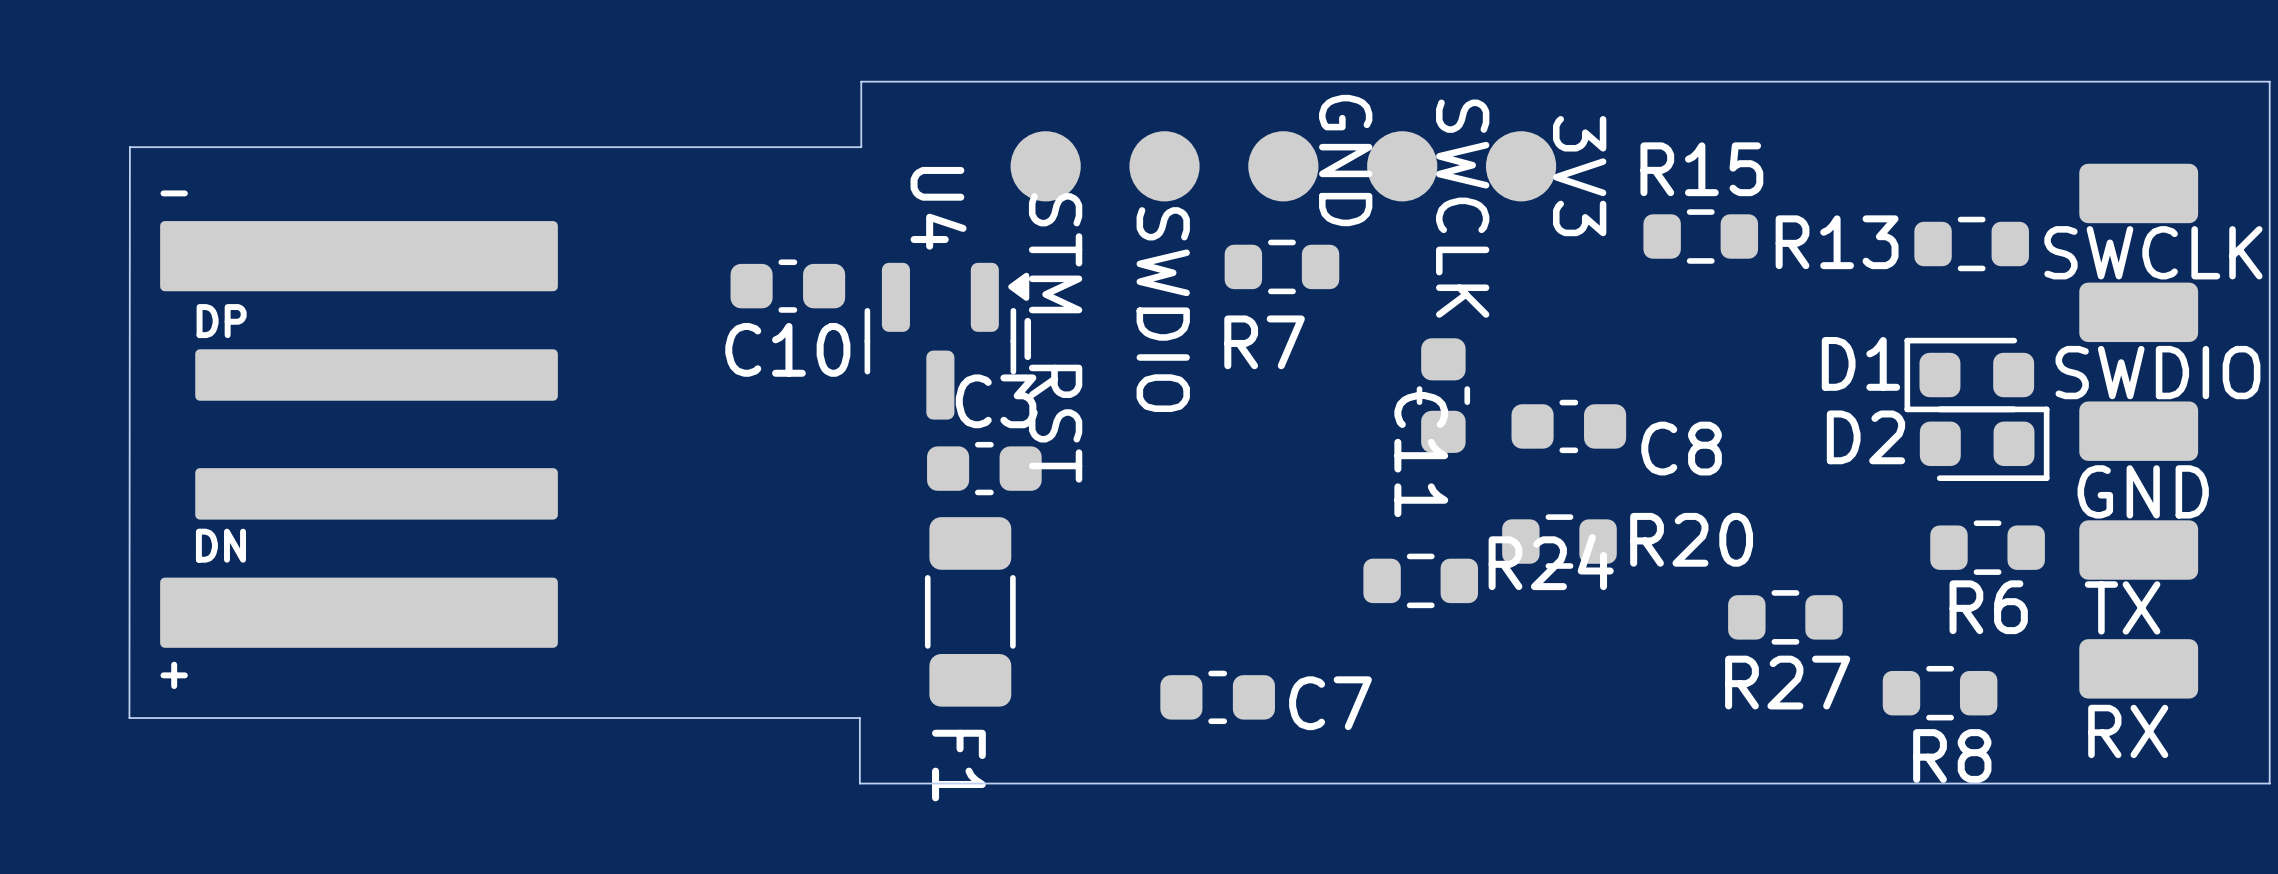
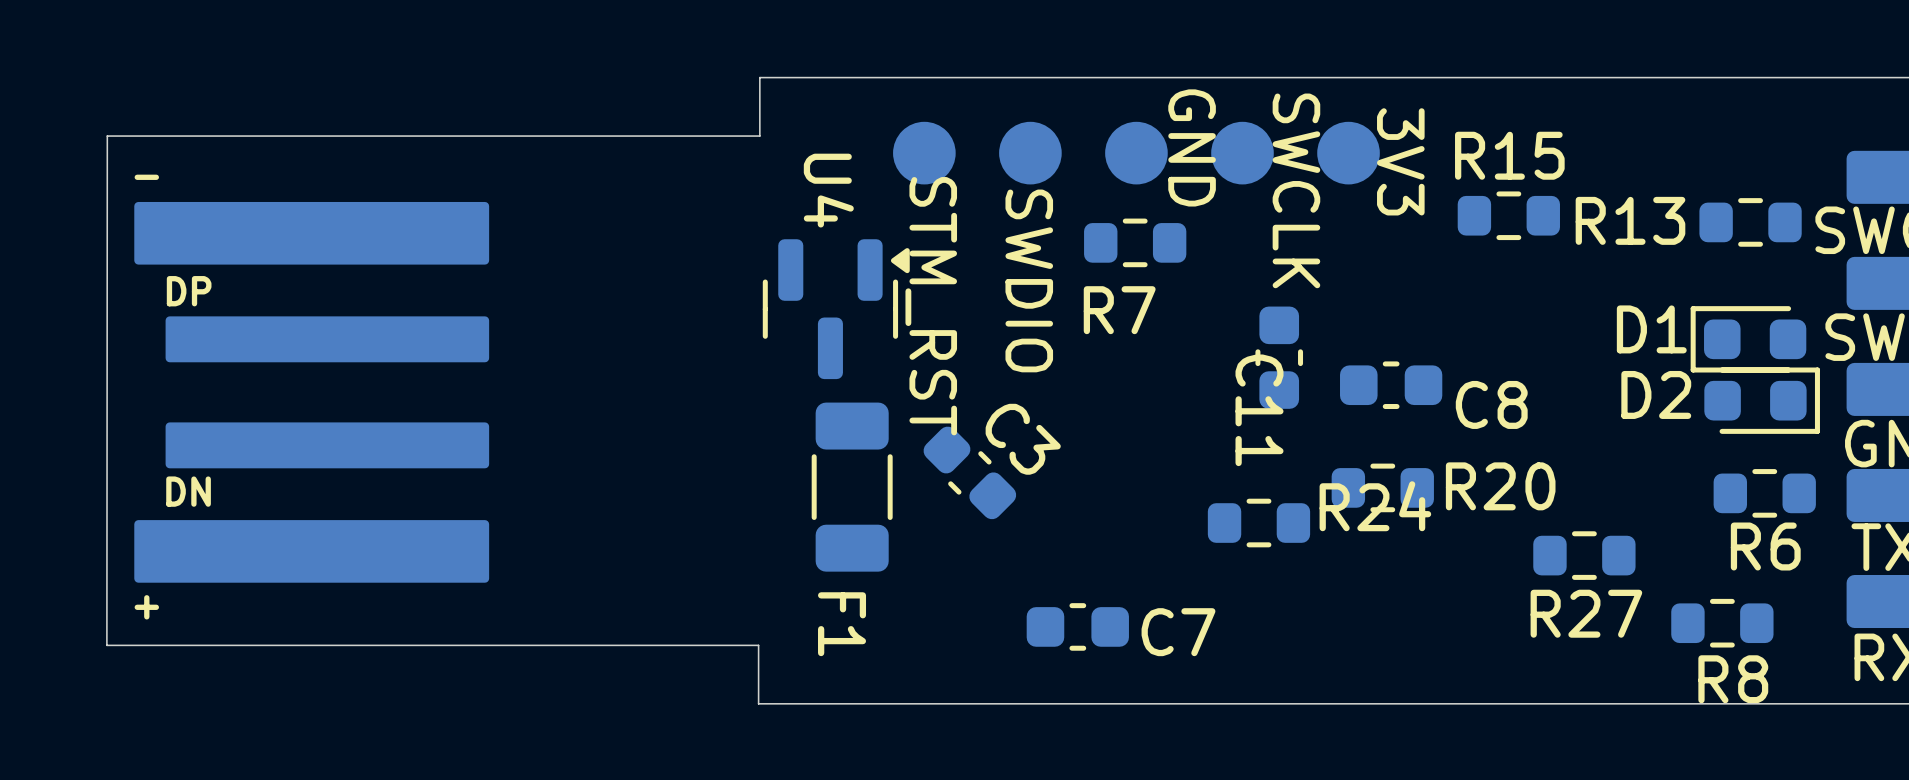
C10: (787, 286) -> none
C3 rotation: 0° (984, 468) -> 45° clockwise (969, 472)
C3 position: (984, 468) -> (969, 472)
F1 position: (970, 611) -> (852, 487)

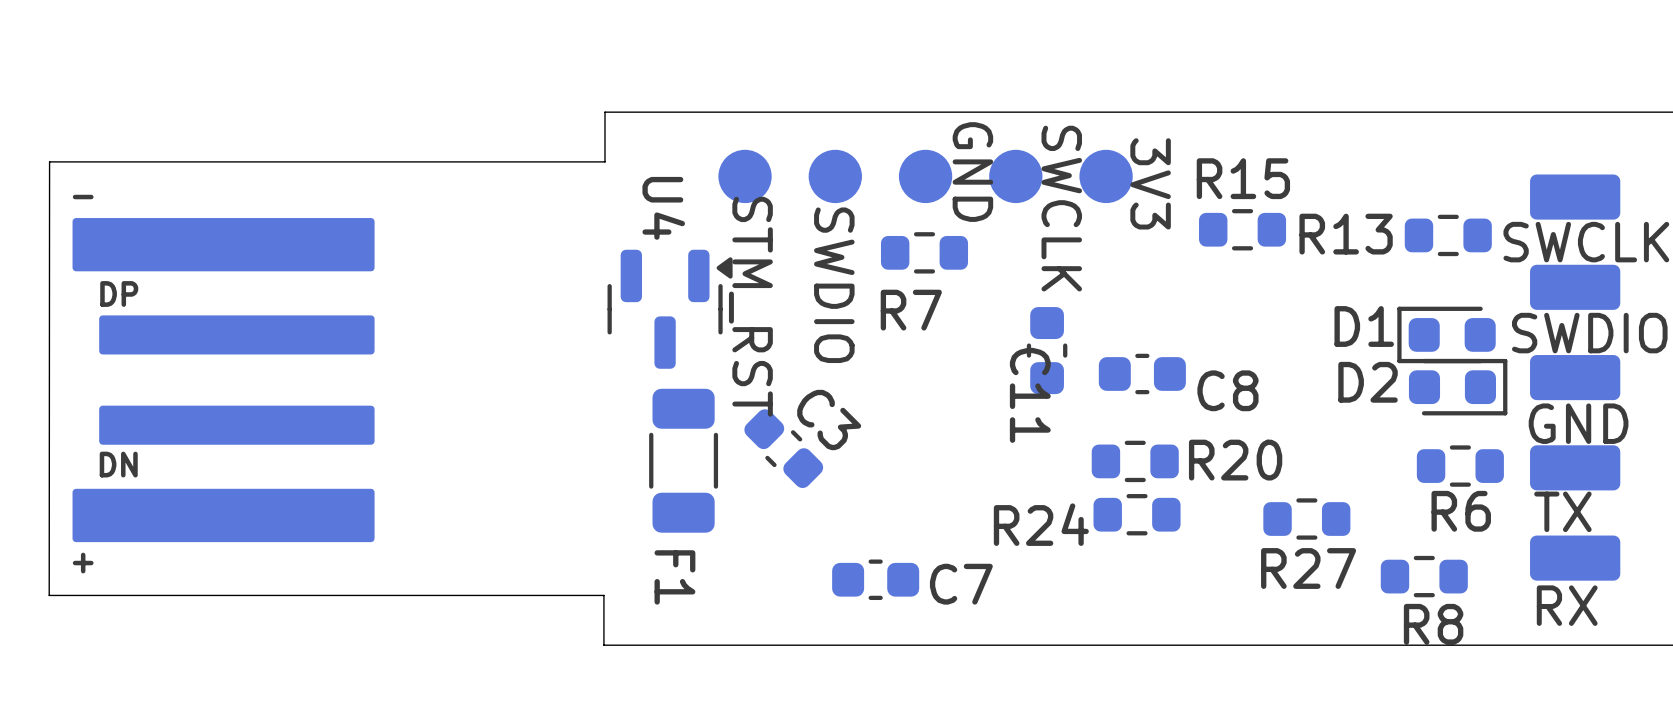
R24 name position: R24 (1375, 506) -> R24 (1041, 524)
R24 position: (1258, 523) -> (1137, 514)

